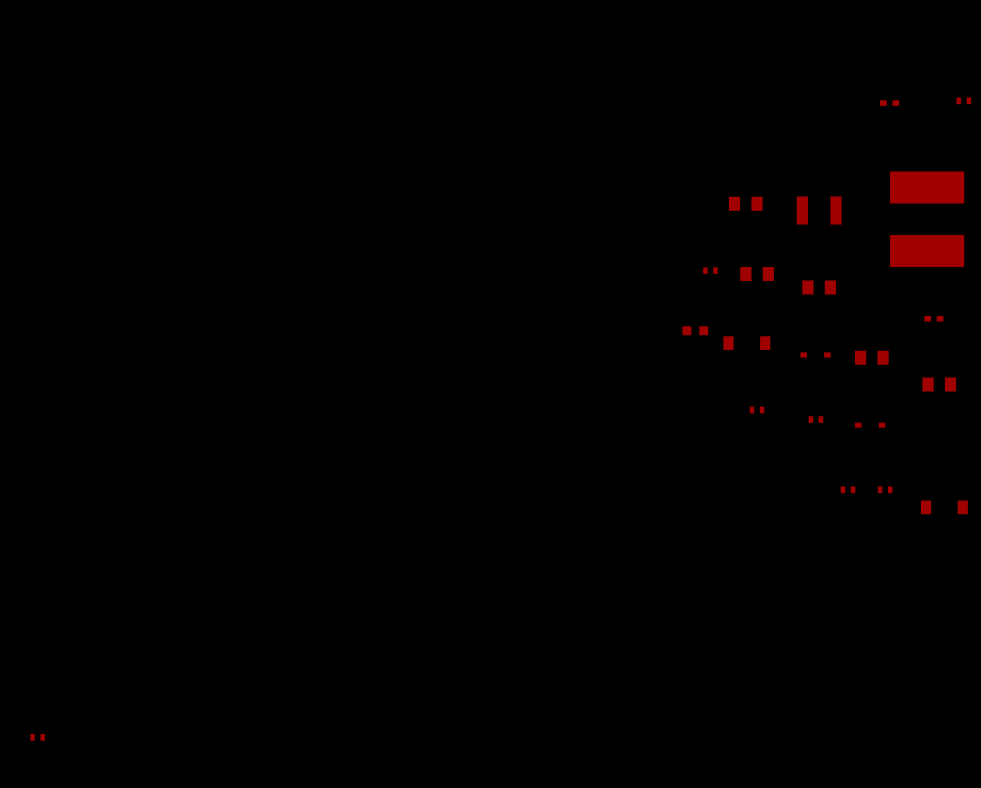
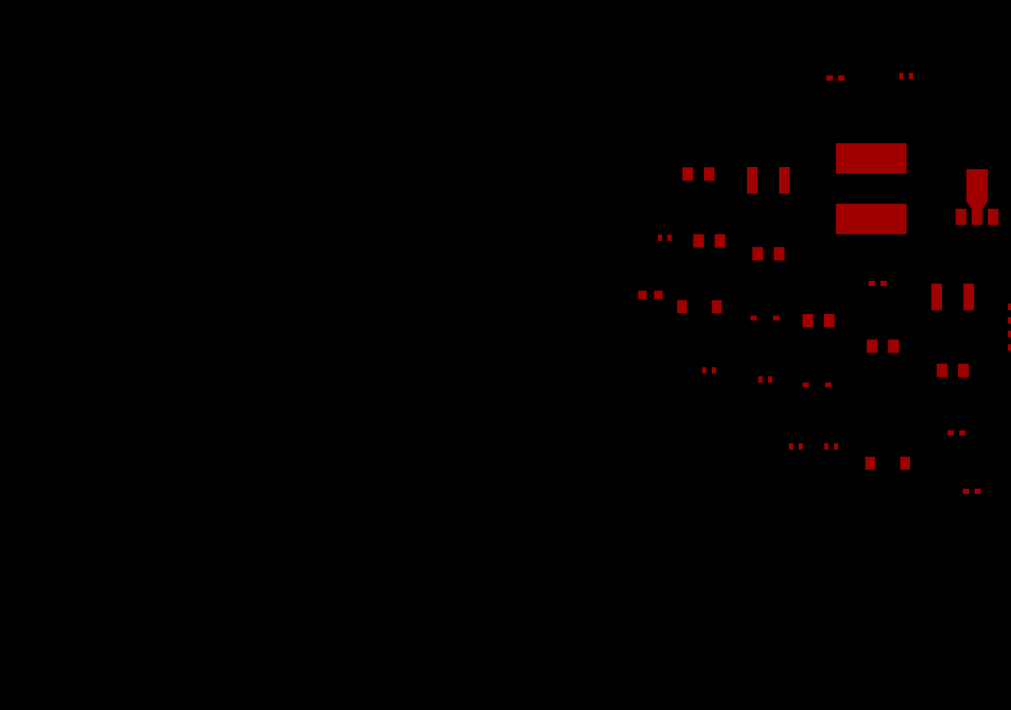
part: (37, 737) -> none

